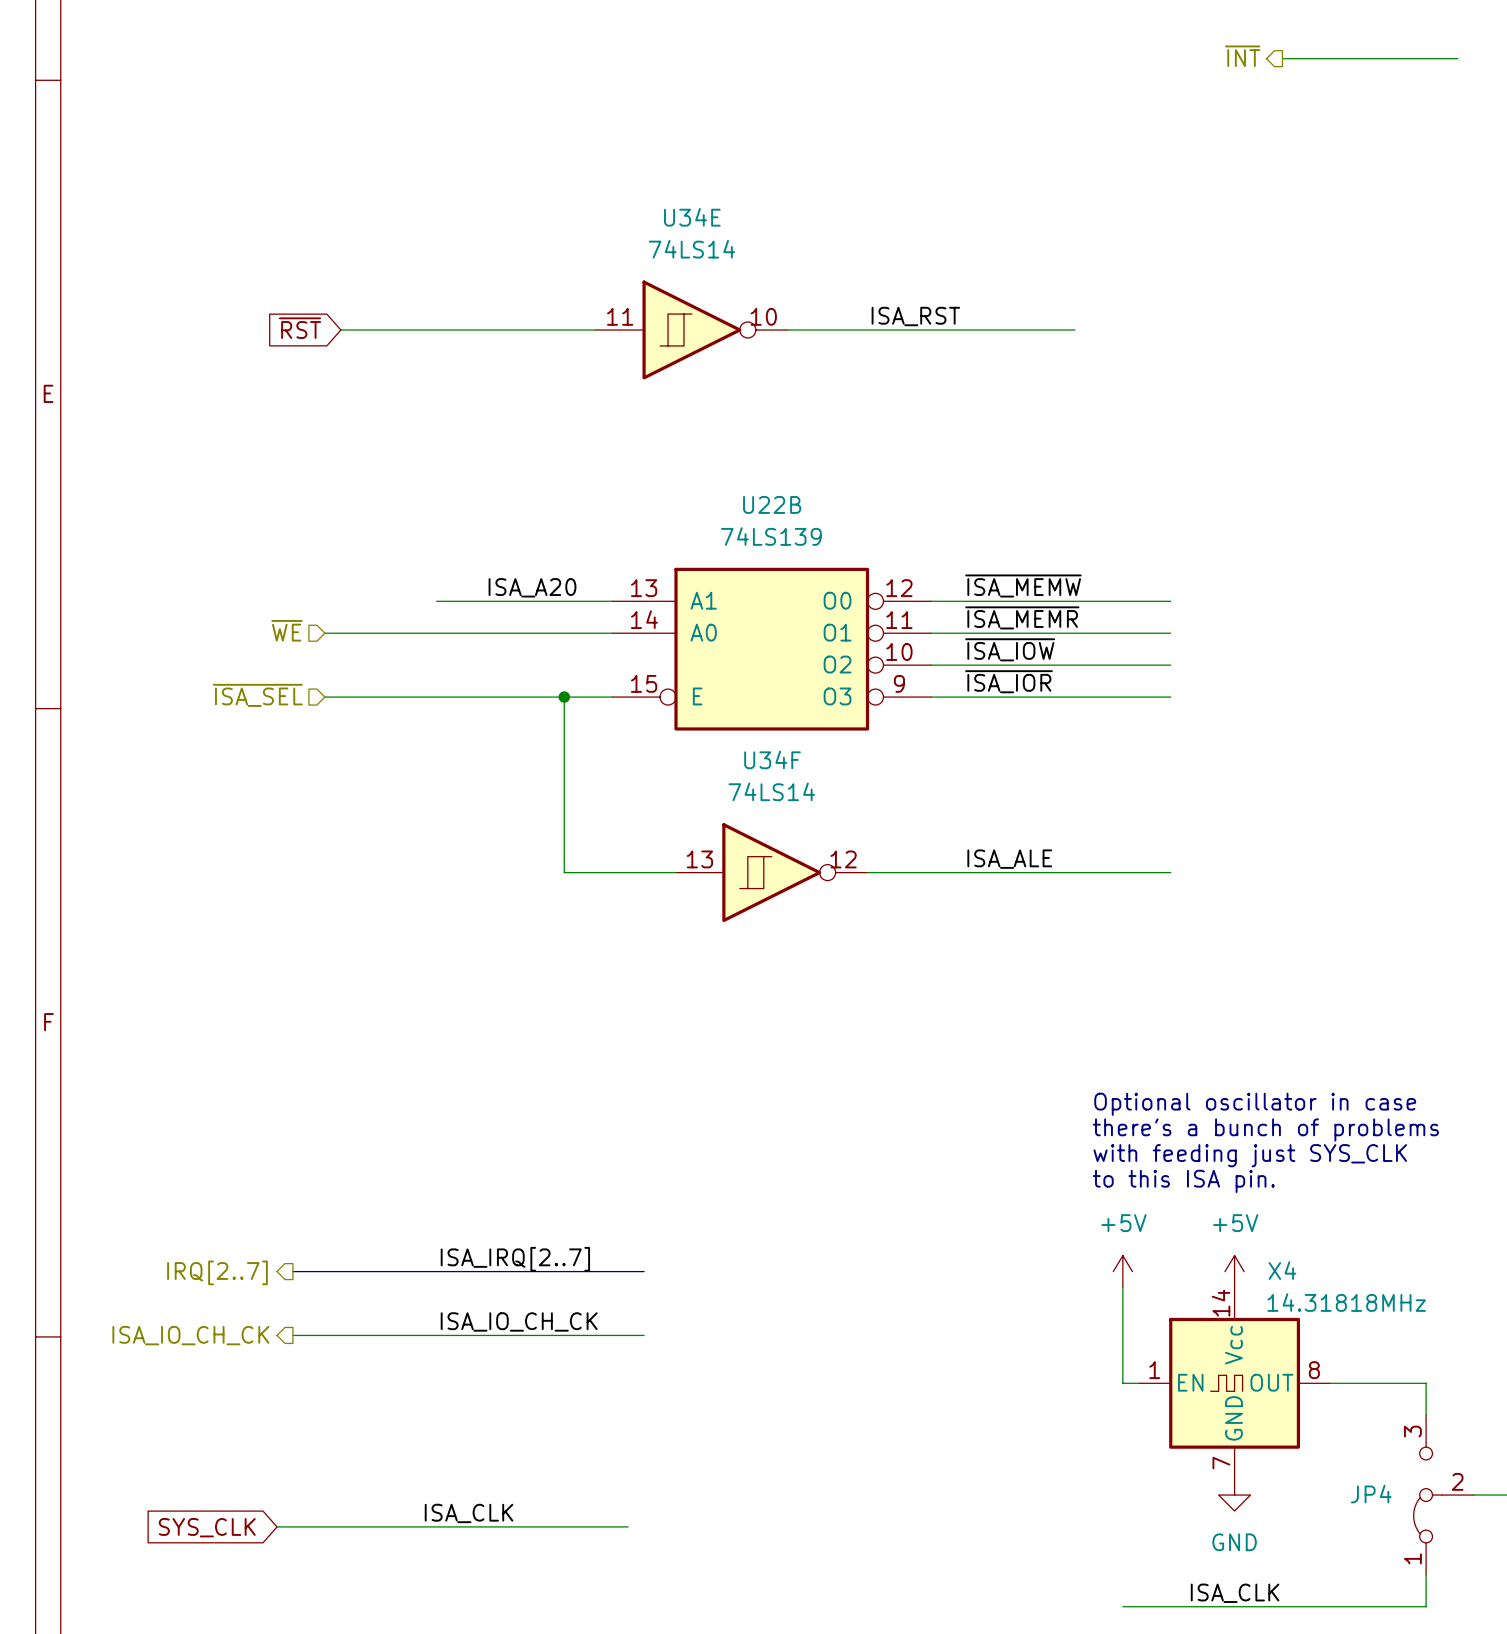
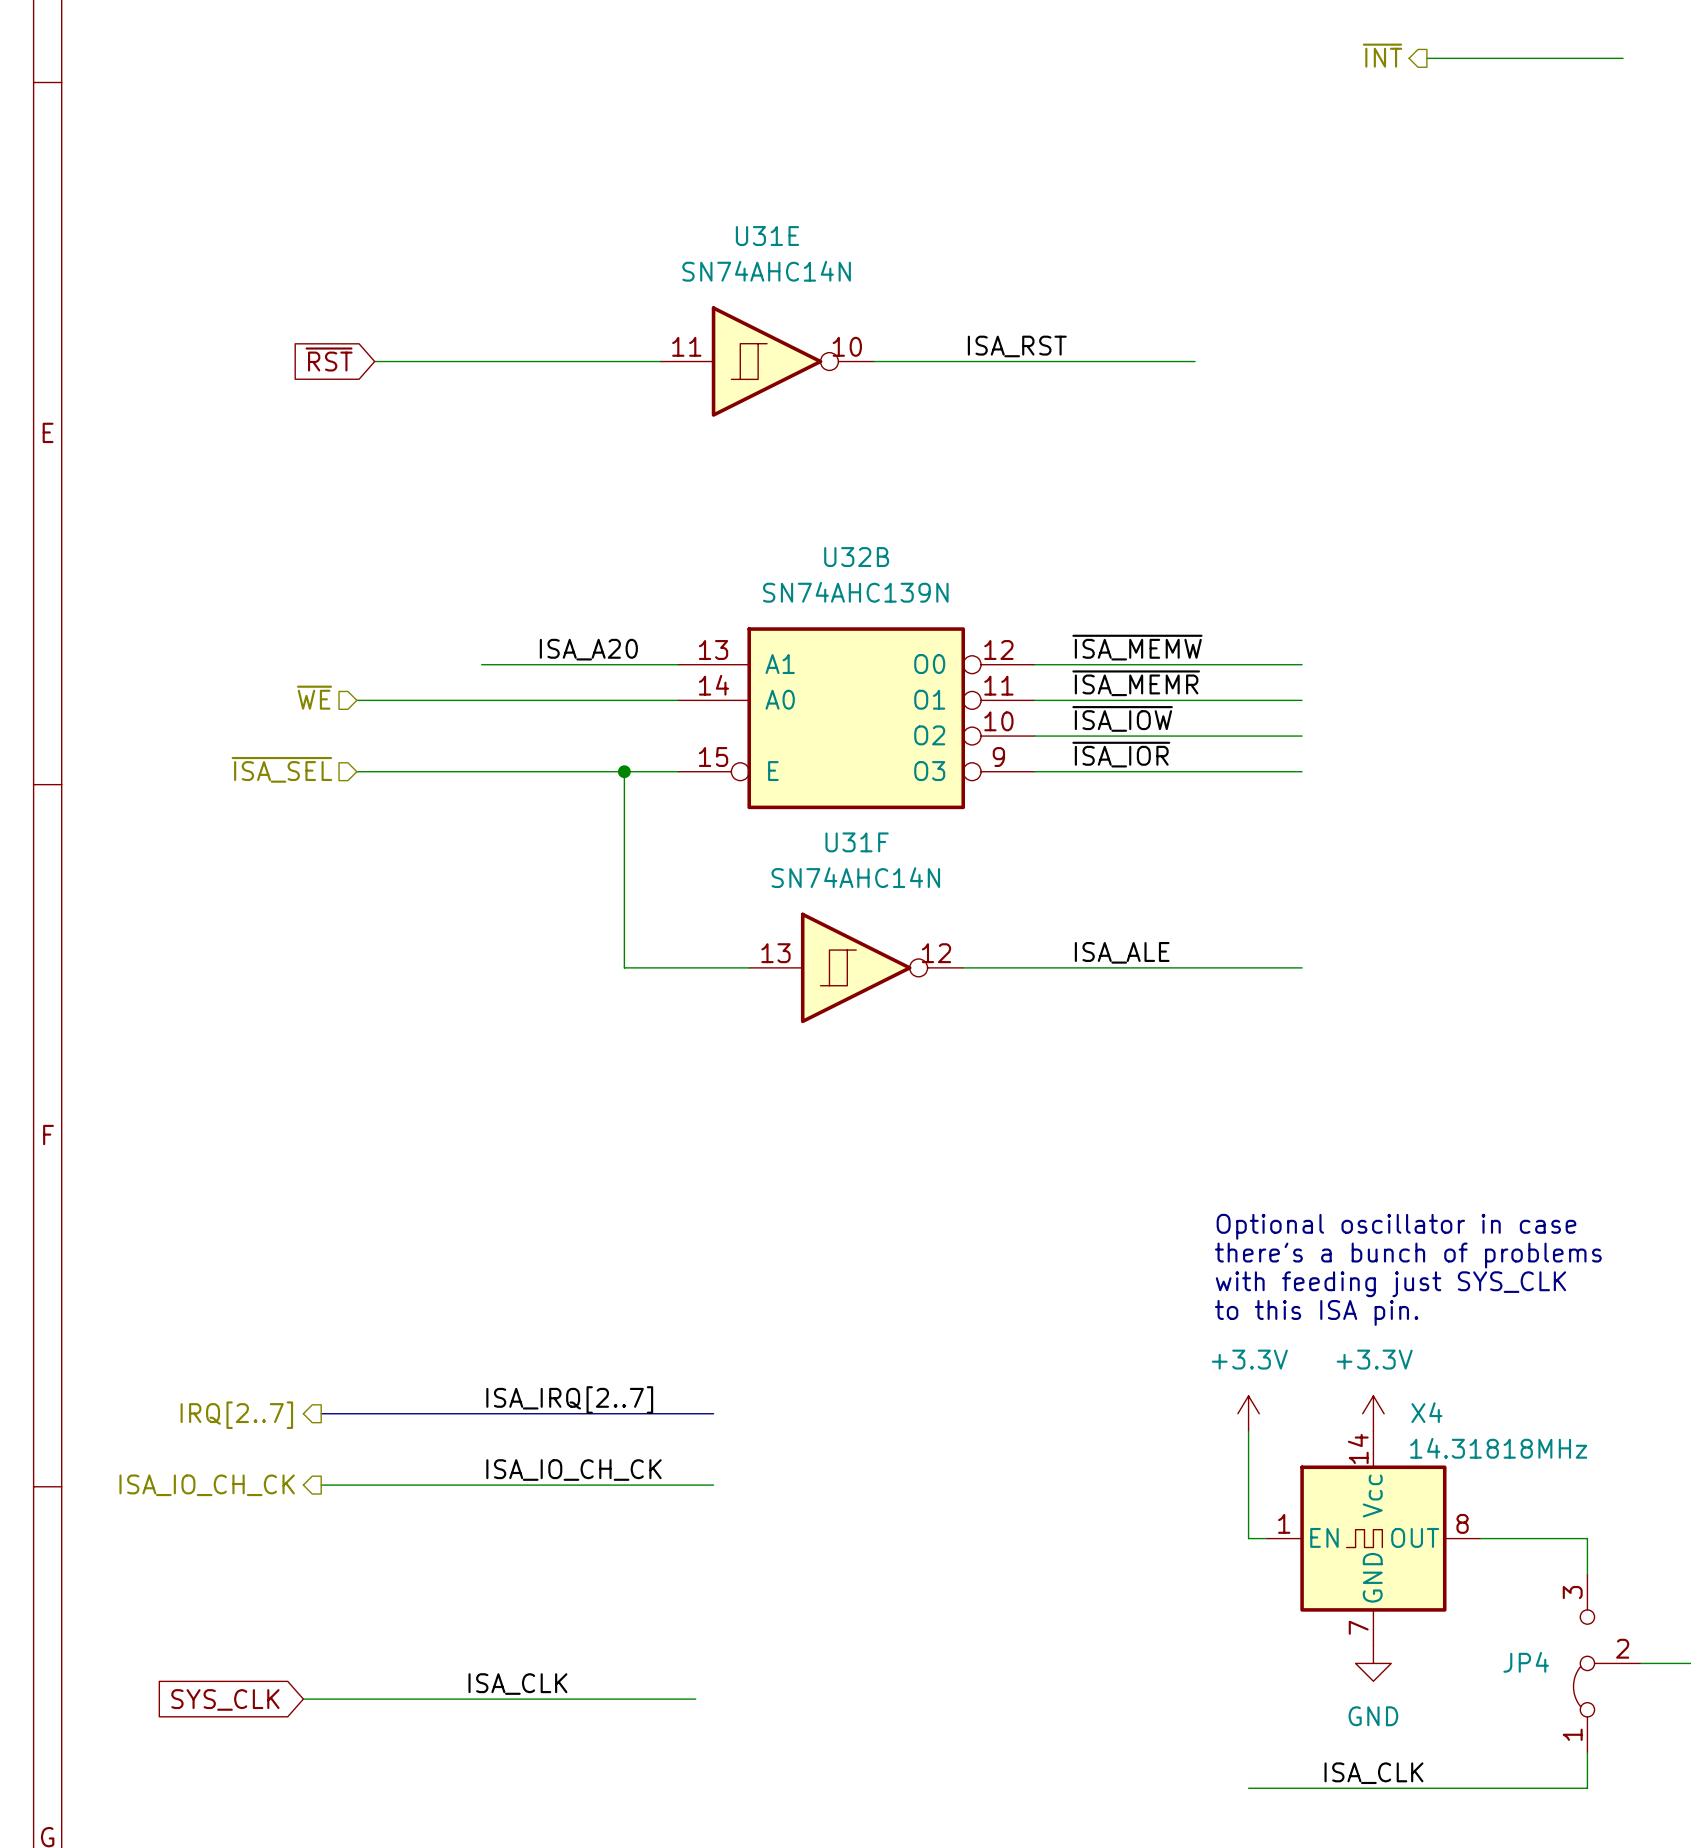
U34E name: U34E (692, 217) -> U31E (767, 236)
U34E value: 74LS14 (691, 249) -> SN74AHC14N (766, 271)
U22B name: U22B (772, 504) -> U32B (856, 557)
U22B value: 74LS139 (771, 536) -> SN74AHC139N (855, 592)
U34F name: U34F (772, 759) -> U31F (857, 842)
U34F value: 74LS14 (771, 791) -> SN74AHC14N (855, 877)
power symbol: +5V (1122, 1271) -> +3.3V (1248, 1413)
power symbol: +5V (1234, 1271) -> +3.3V (1373, 1413)

